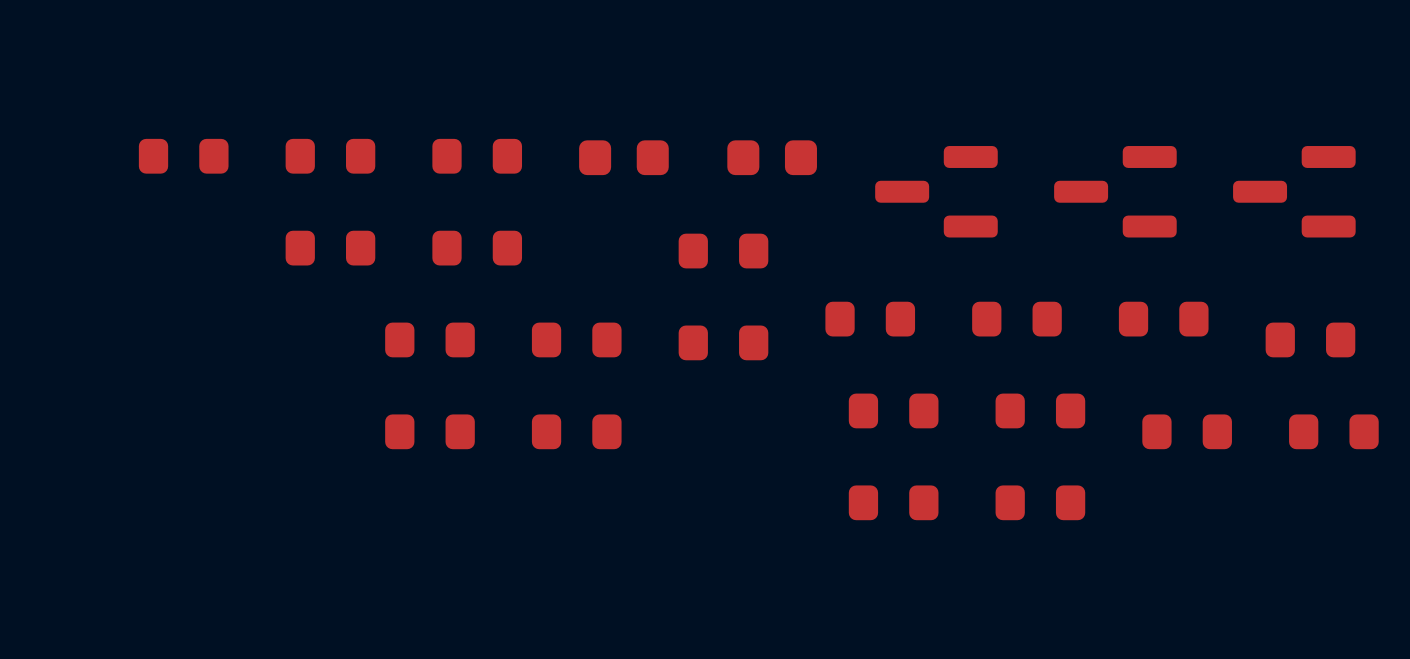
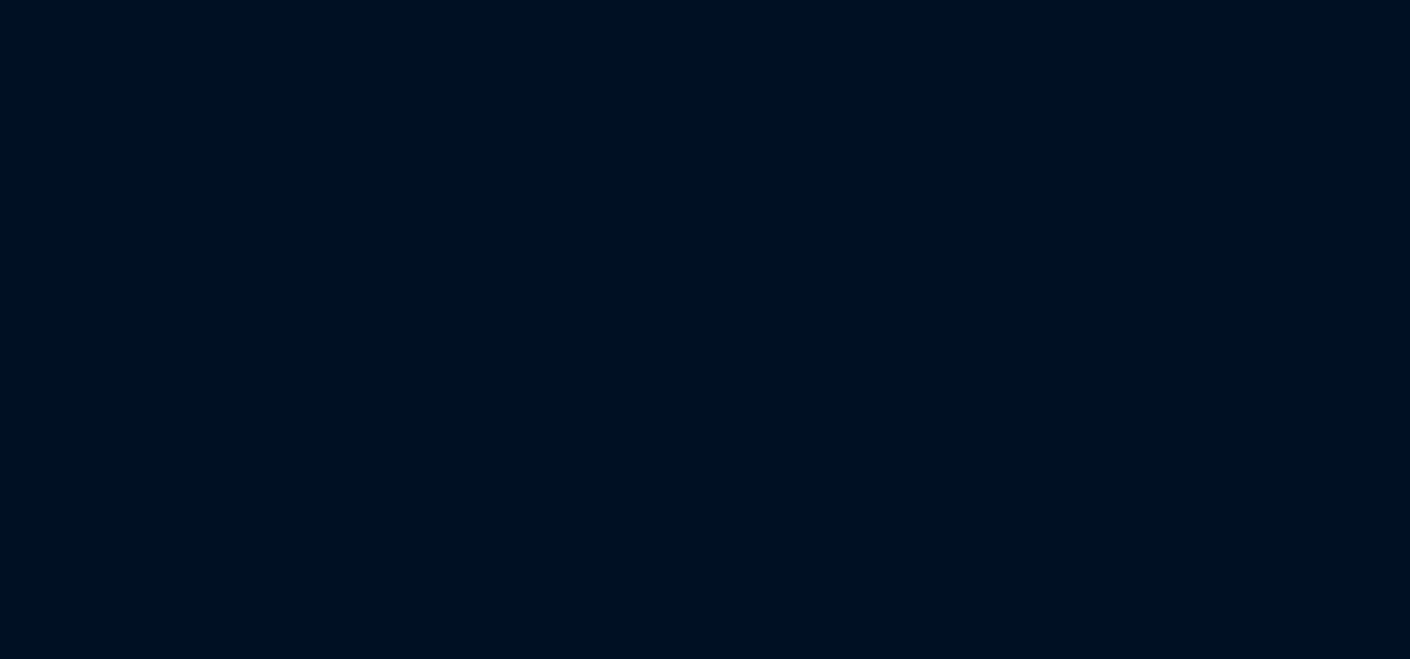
part: (183, 156) -> none
part: (330, 156) -> none
part: (477, 156) -> none
part: (623, 157) -> none
part: (772, 157) -> none
part: (936, 191) -> none
part: (1115, 191) -> none
part: (1294, 191) -> none
part: (330, 248) -> none
part: (477, 248) -> none
part: (723, 251) -> none
part: (870, 319) -> none
part: (1016, 319) -> none
part: (1163, 319) -> none
part: (429, 339) -> none
part: (576, 339) -> none
part: (1310, 339) -> none
part: (723, 342) -> none
part: (893, 410) -> none
part: (1040, 410) -> none
part: (429, 431) -> none
part: (576, 431) -> none
part: (1187, 431) -> none
part: (1333, 431) -> none
part: (893, 502) -> none
part: (1040, 502) -> none

